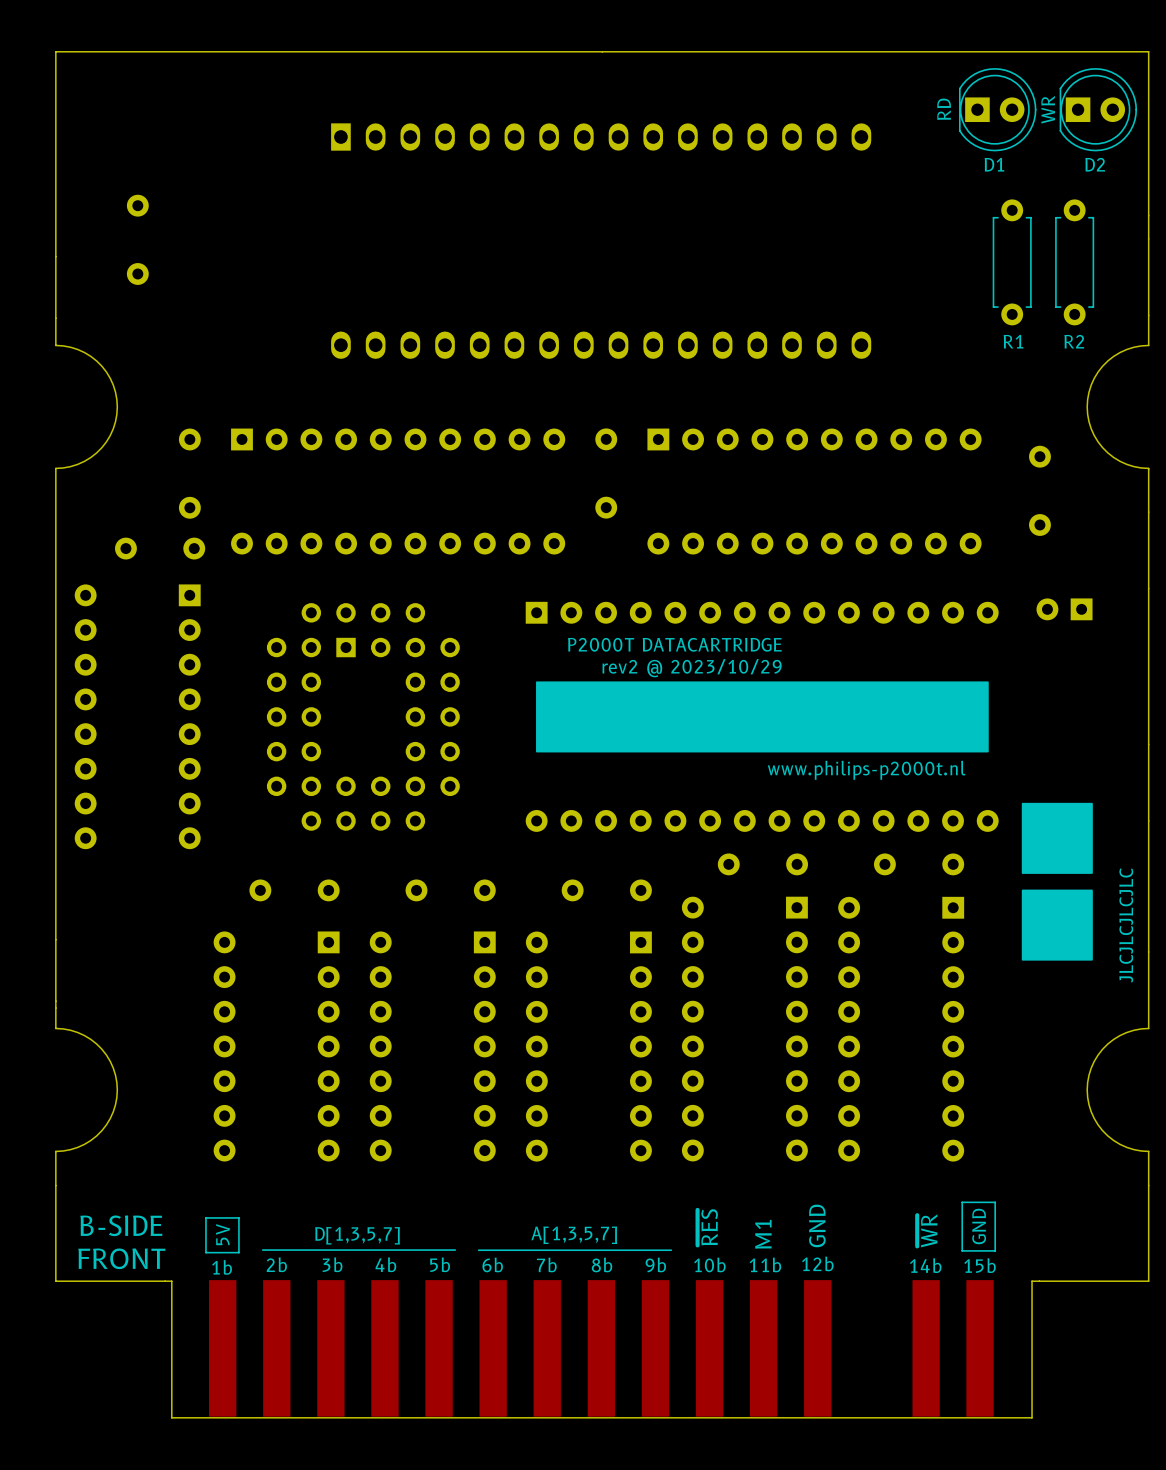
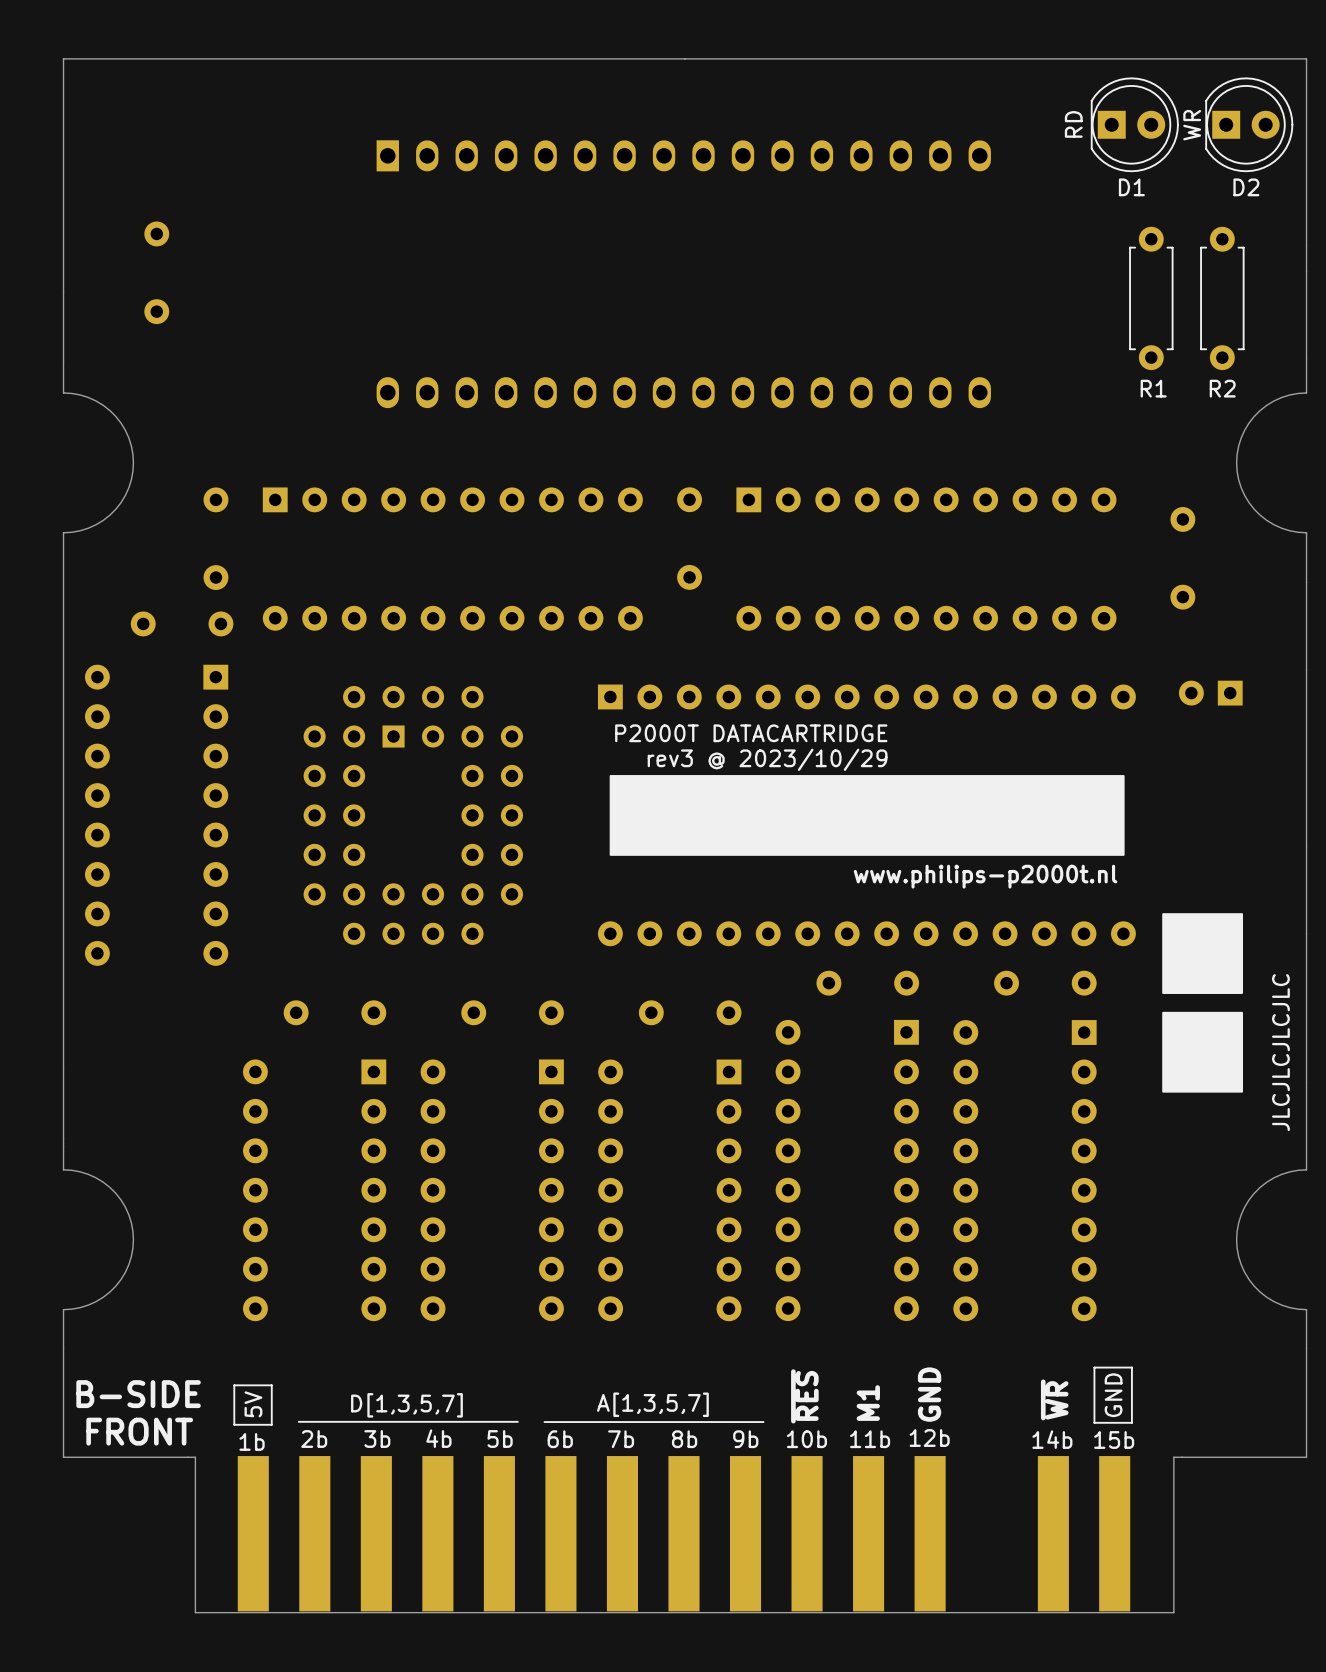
text: rev2 @ 2023/10/29 (692, 668) -> rev3 @ 2023/10/29 (767, 759)

